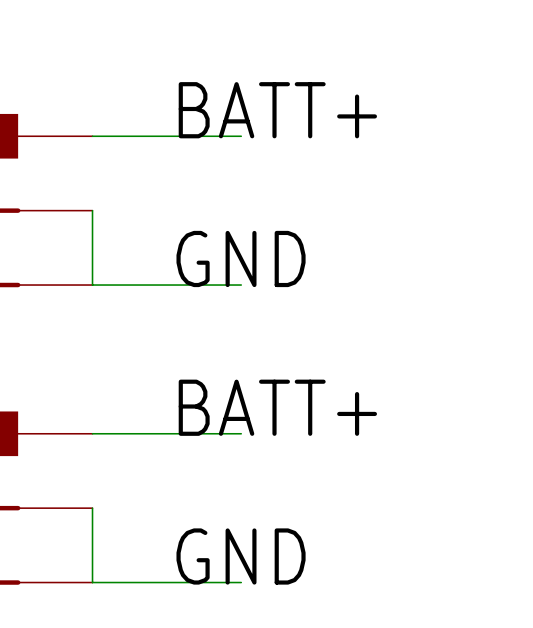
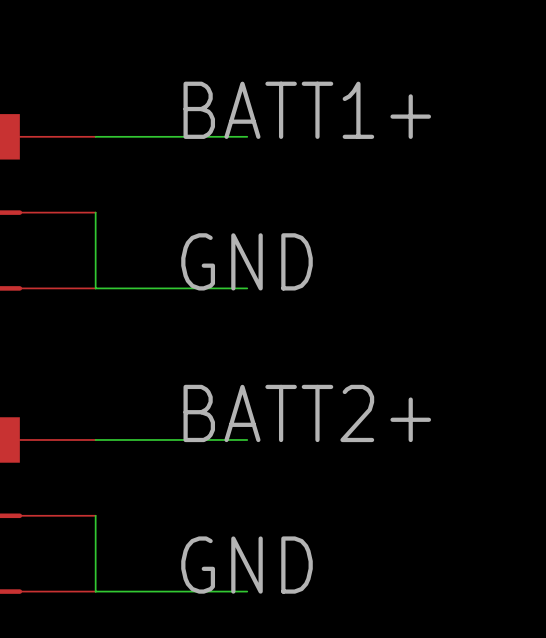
label: BATT+ (277, 110) -> BATT1+ (307, 110)
label: BATT+ (277, 407) -> BATT2+ (307, 413)

